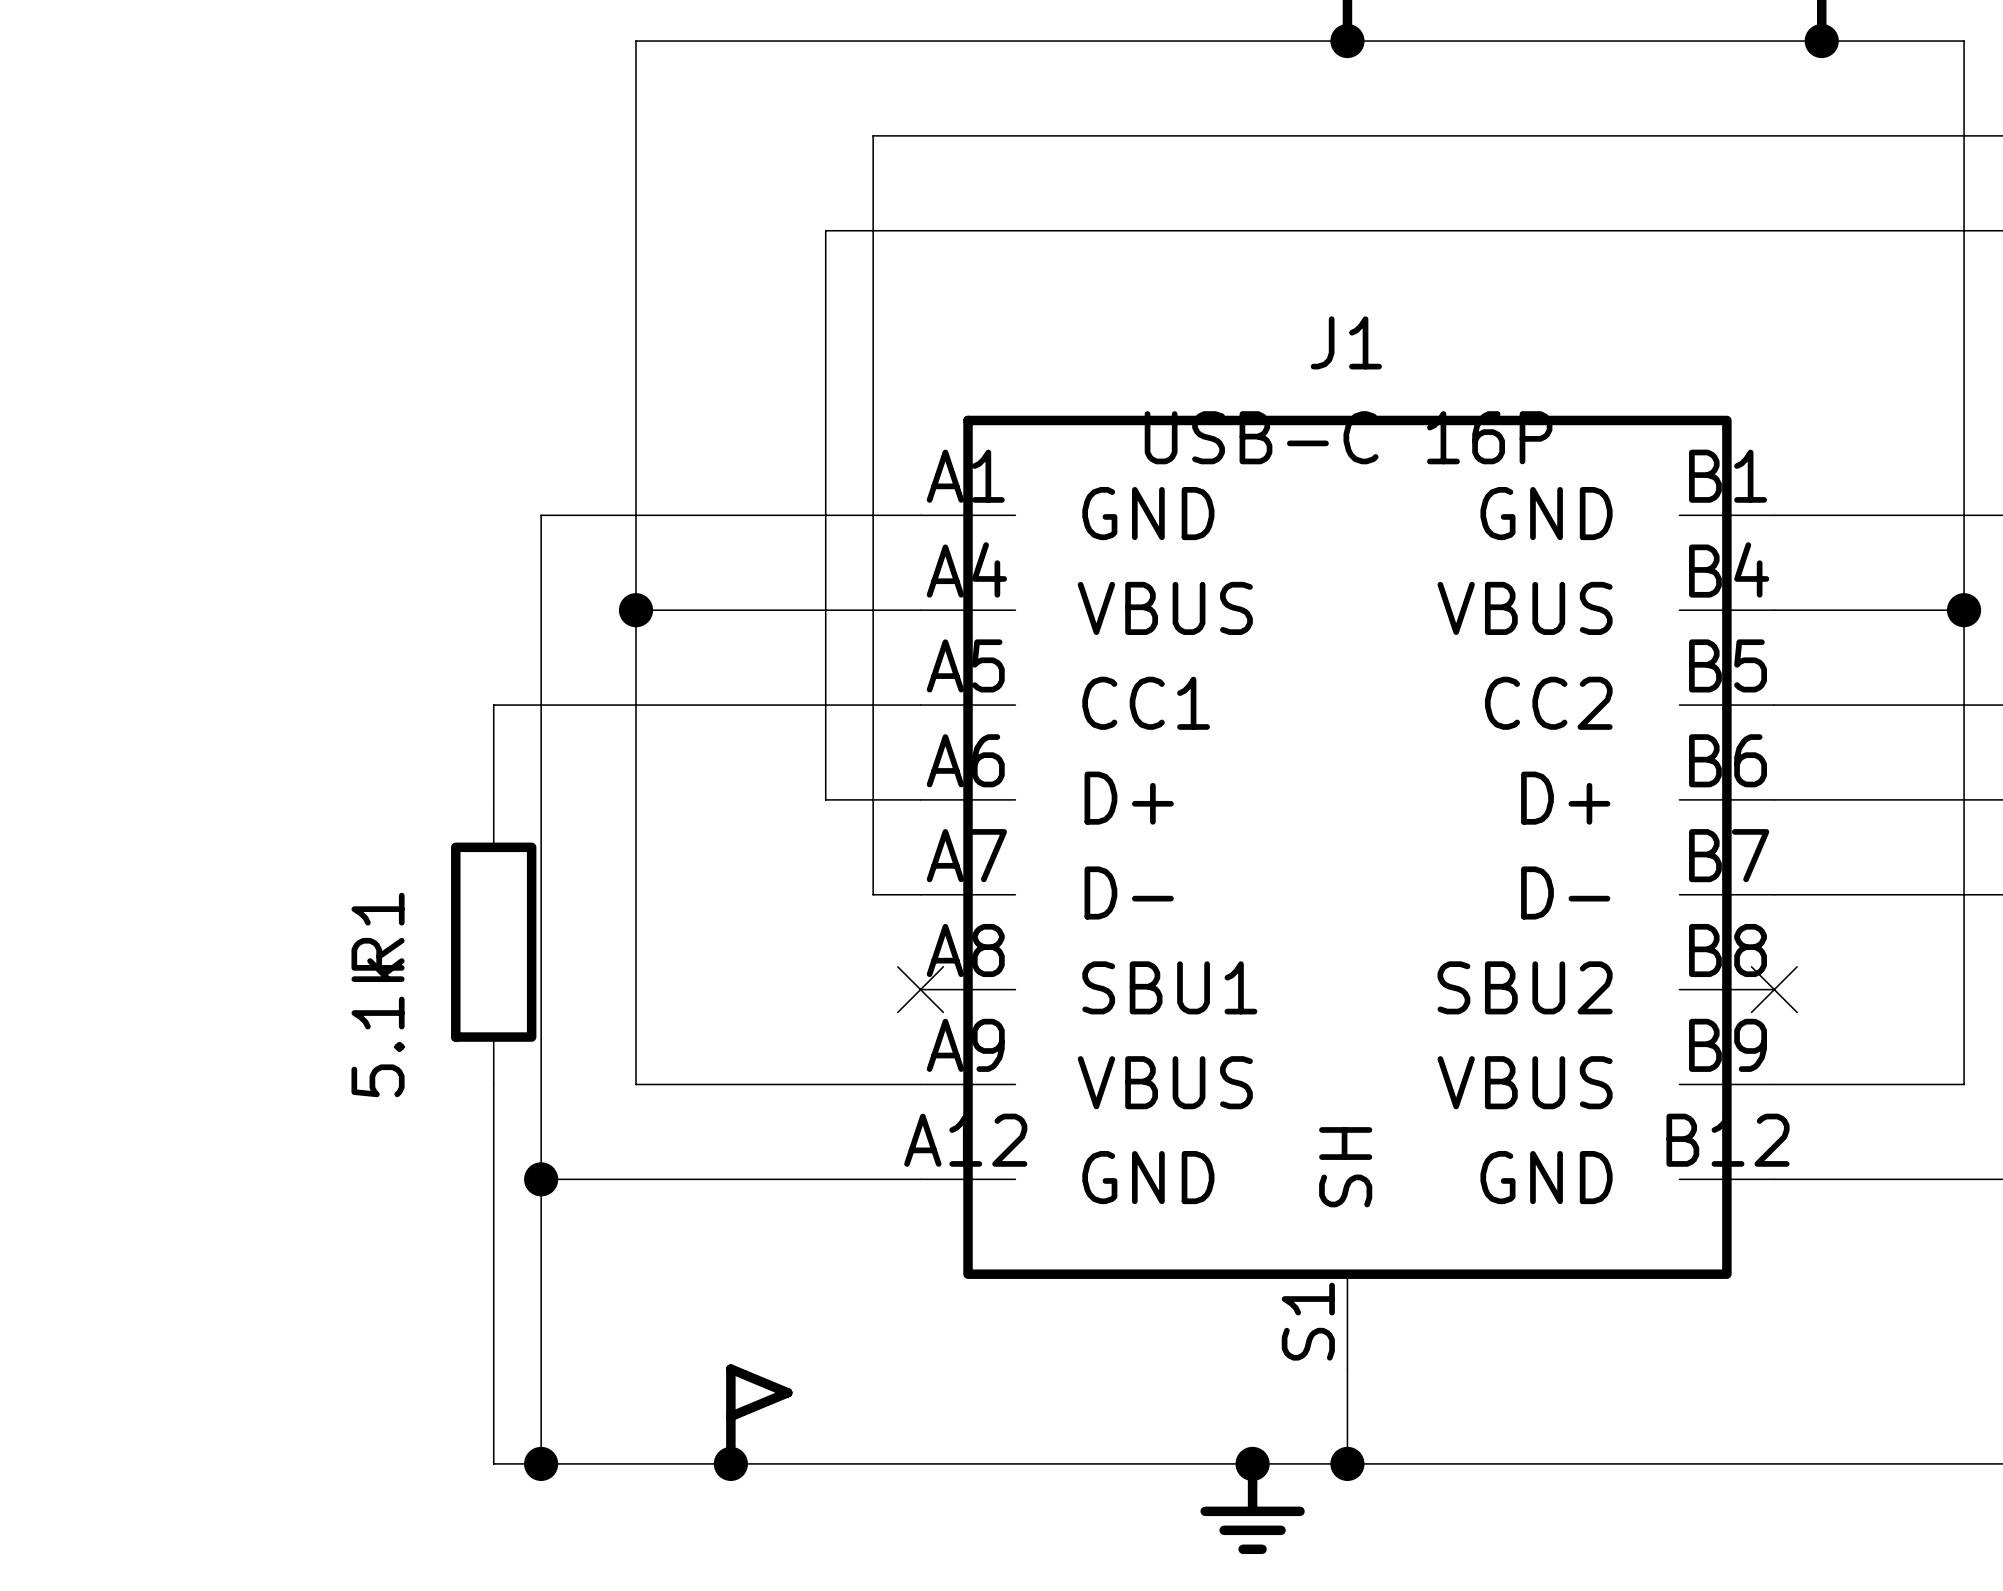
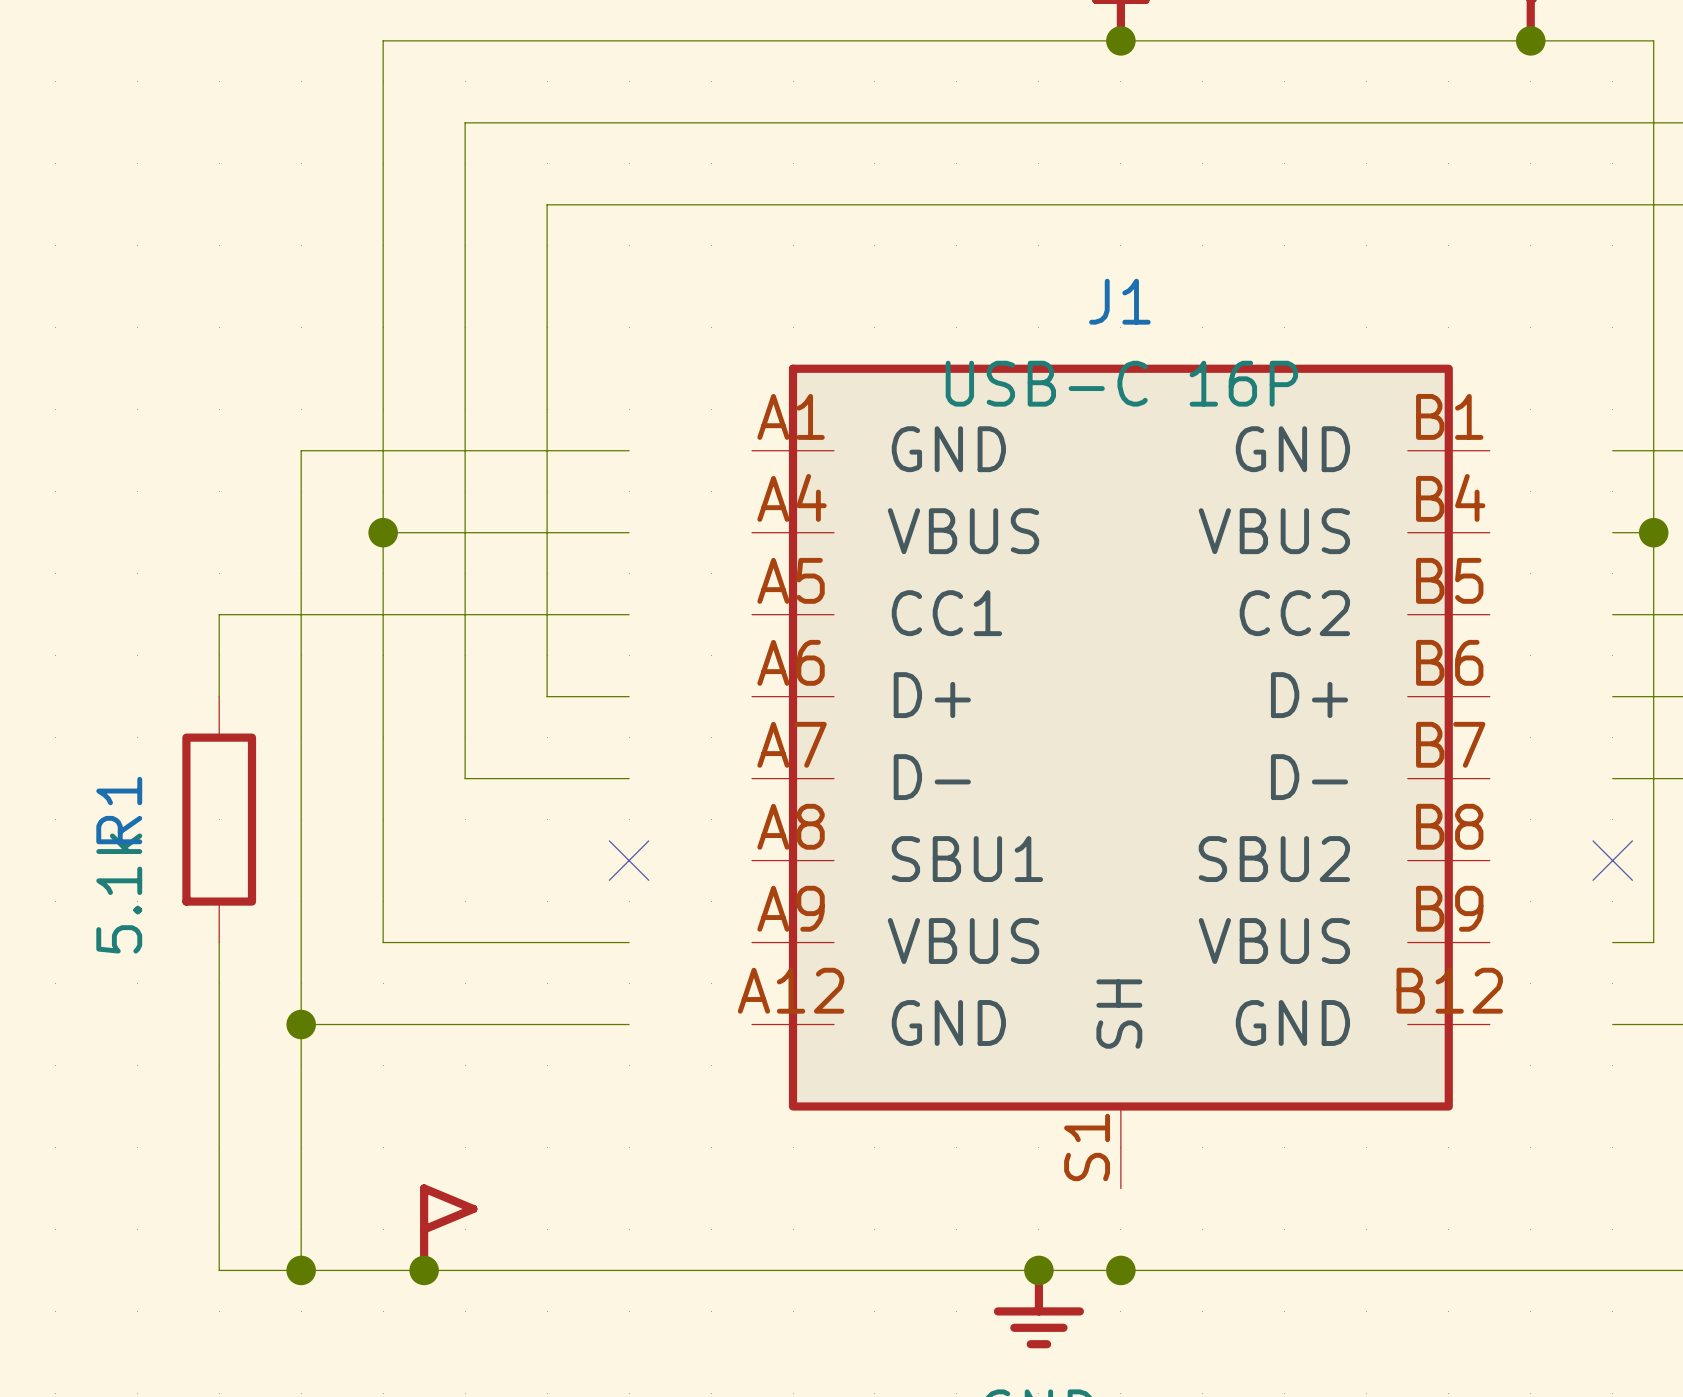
wire: (636, 41) (636, 1084) -> (506, 40) (383, 40) (383, 614) (219, 614) (219, 696)
wire: (873, 135) (873, 894) (920, 894) -> (711, 122) (465, 122) (465, 778) (629, 778)
wire: (825, 230) (825, 799) (920, 799) -> (670, 204) (547, 204) (547, 696) (629, 696)
wire: (541, 515) (541, 1463) -> (424, 450) (301, 450) (301, 1270)
wire: (778, 515) (920, 515) -> none
wire: (1774, 515) (1916, 515) -> none
junction position: (636, 610) -> (383, 532)
wire: (778, 610) (920, 610) -> (383, 532) (506, 532)
wire: (1774, 610) (1916, 610) -> none
wire: (778, 705) (920, 705) -> none
wire: (1774, 705) (1916, 705) -> none
wire: none -> (383, 696) (383, 942) (506, 942)
wire: (1774, 799) (1916, 799) -> none
wire: (1774, 894) (1916, 894) -> none
R1 position: (493, 942) -> (219, 819)
no-connect mark position: (920, 989) -> (629, 860)
no-connect mark position: (1774, 989) -> (1612, 860)
wire: (493, 1084) (493, 1463) -> (219, 942) (219, 1270) (383, 1270)
wire: (778, 1084) (920, 1084) -> none
wire: (1774, 1084) (1916, 1084) -> none
junction position: (541, 1179) -> (301, 1024)
wire: (778, 1179) (920, 1179) -> (301, 1024) (424, 1024)
wire: (1774, 1179) (1916, 1179) -> none
wire: (1347, 1369) (1347, 1463) -> none
power symbol position: (759, 1416) -> (448, 1229)
junction: none -> (301, 1270)
junction: (730, 1463) -> none

